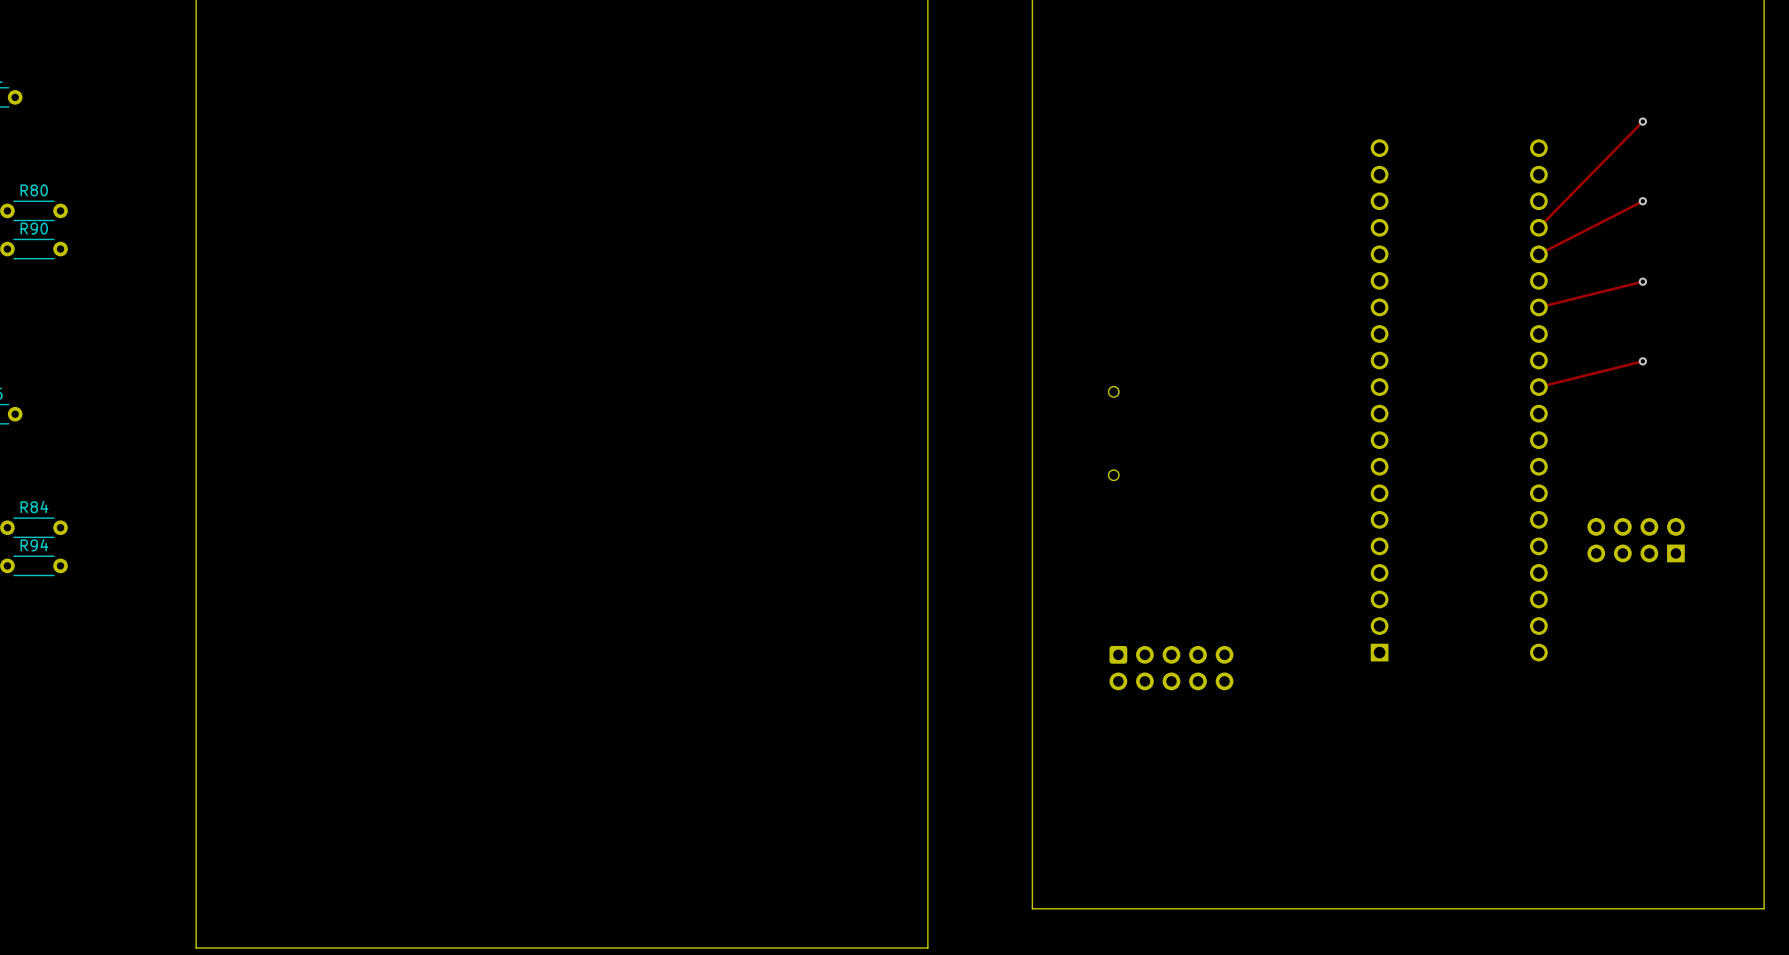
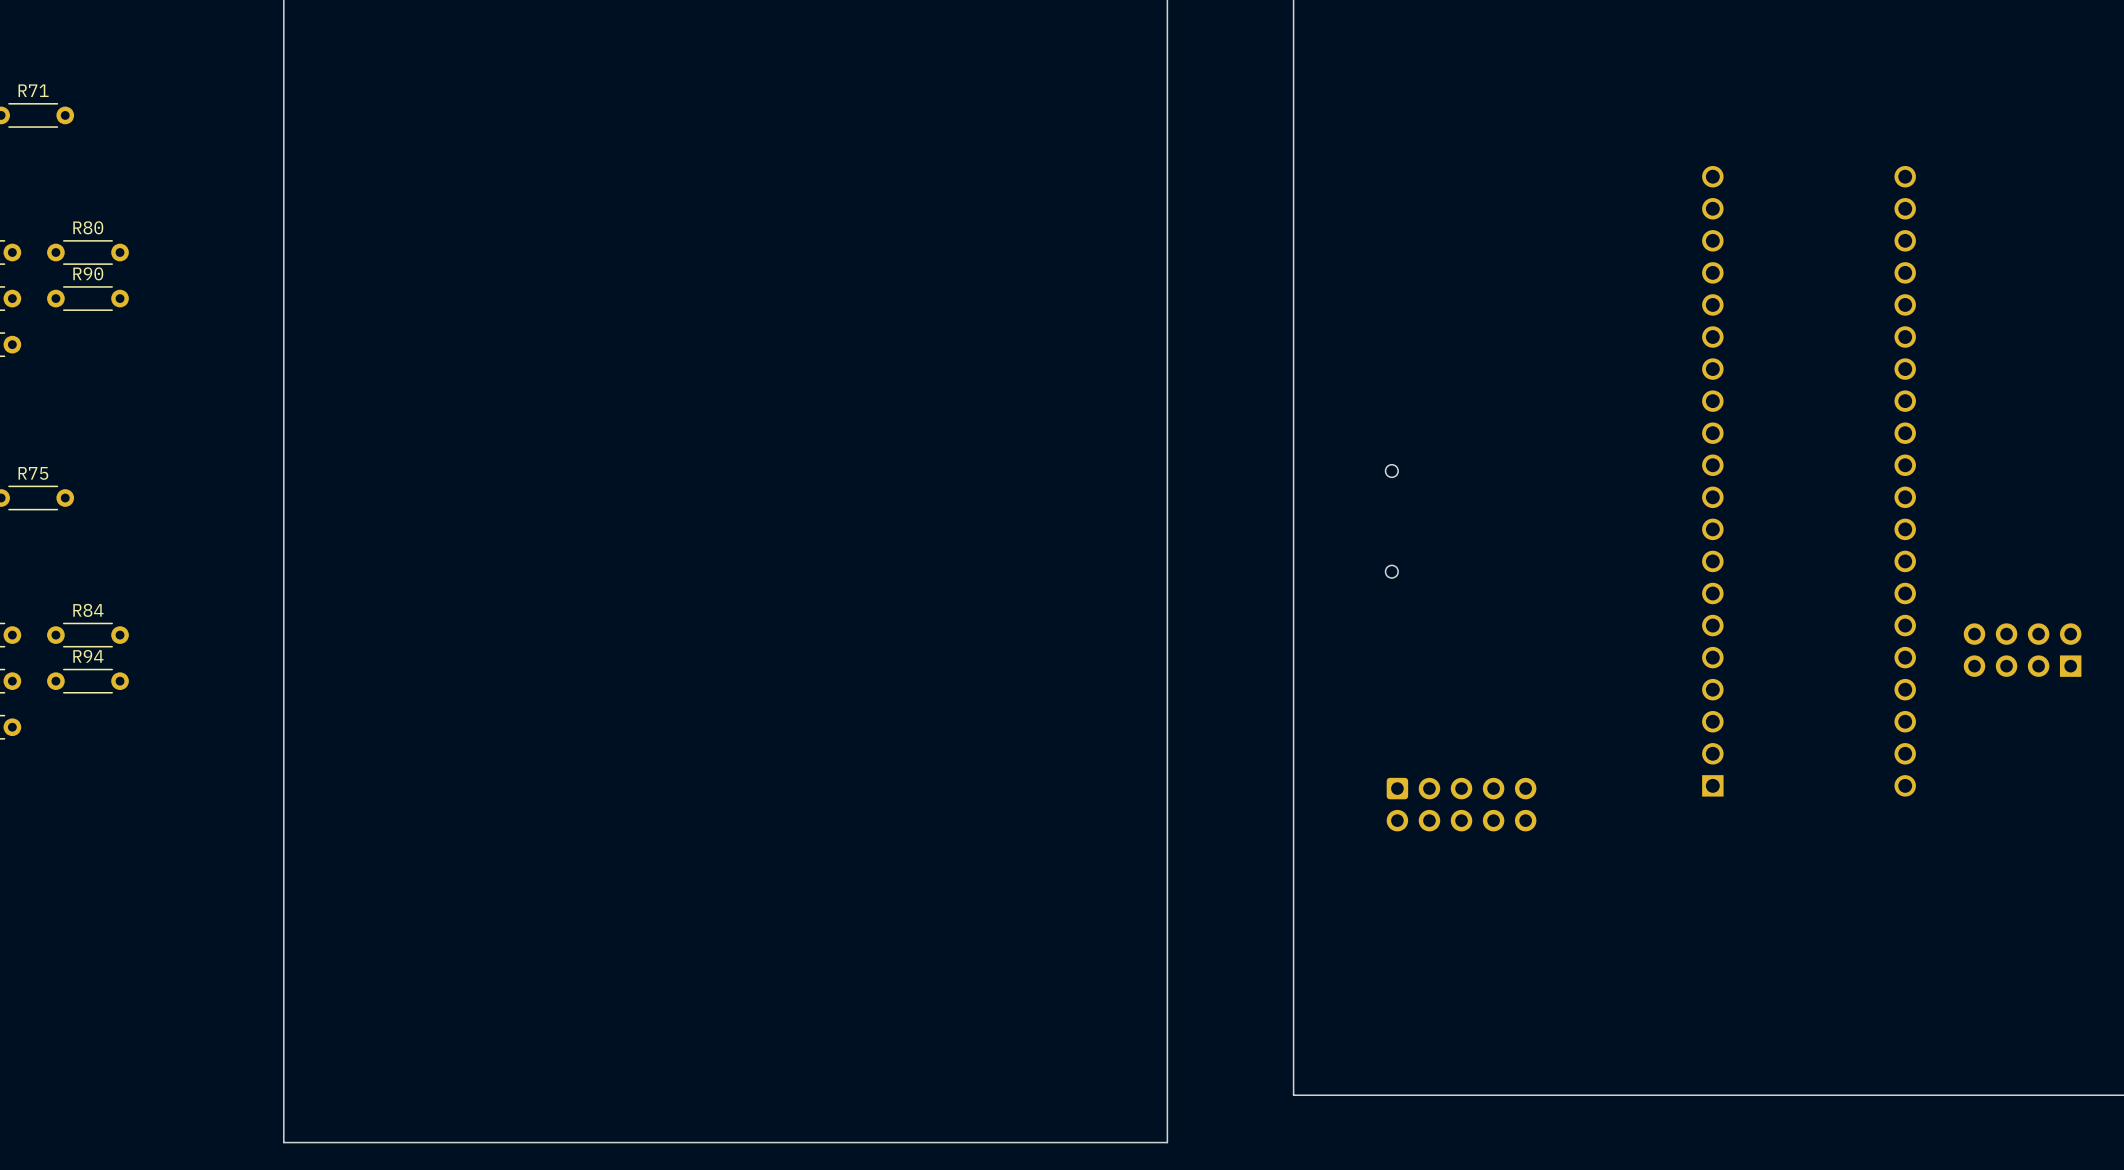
track: (1642, 121) (1538, 227) -> none
via: (1642, 121) -> none
track: (1642, 201) (1538, 254) -> none
via: (1642, 201) -> none
track: (1642, 281) (1538, 307) -> none
via: (1642, 281) -> none
track: (1642, 361) (1538, 387) -> none
via: (1642, 361) -> none

